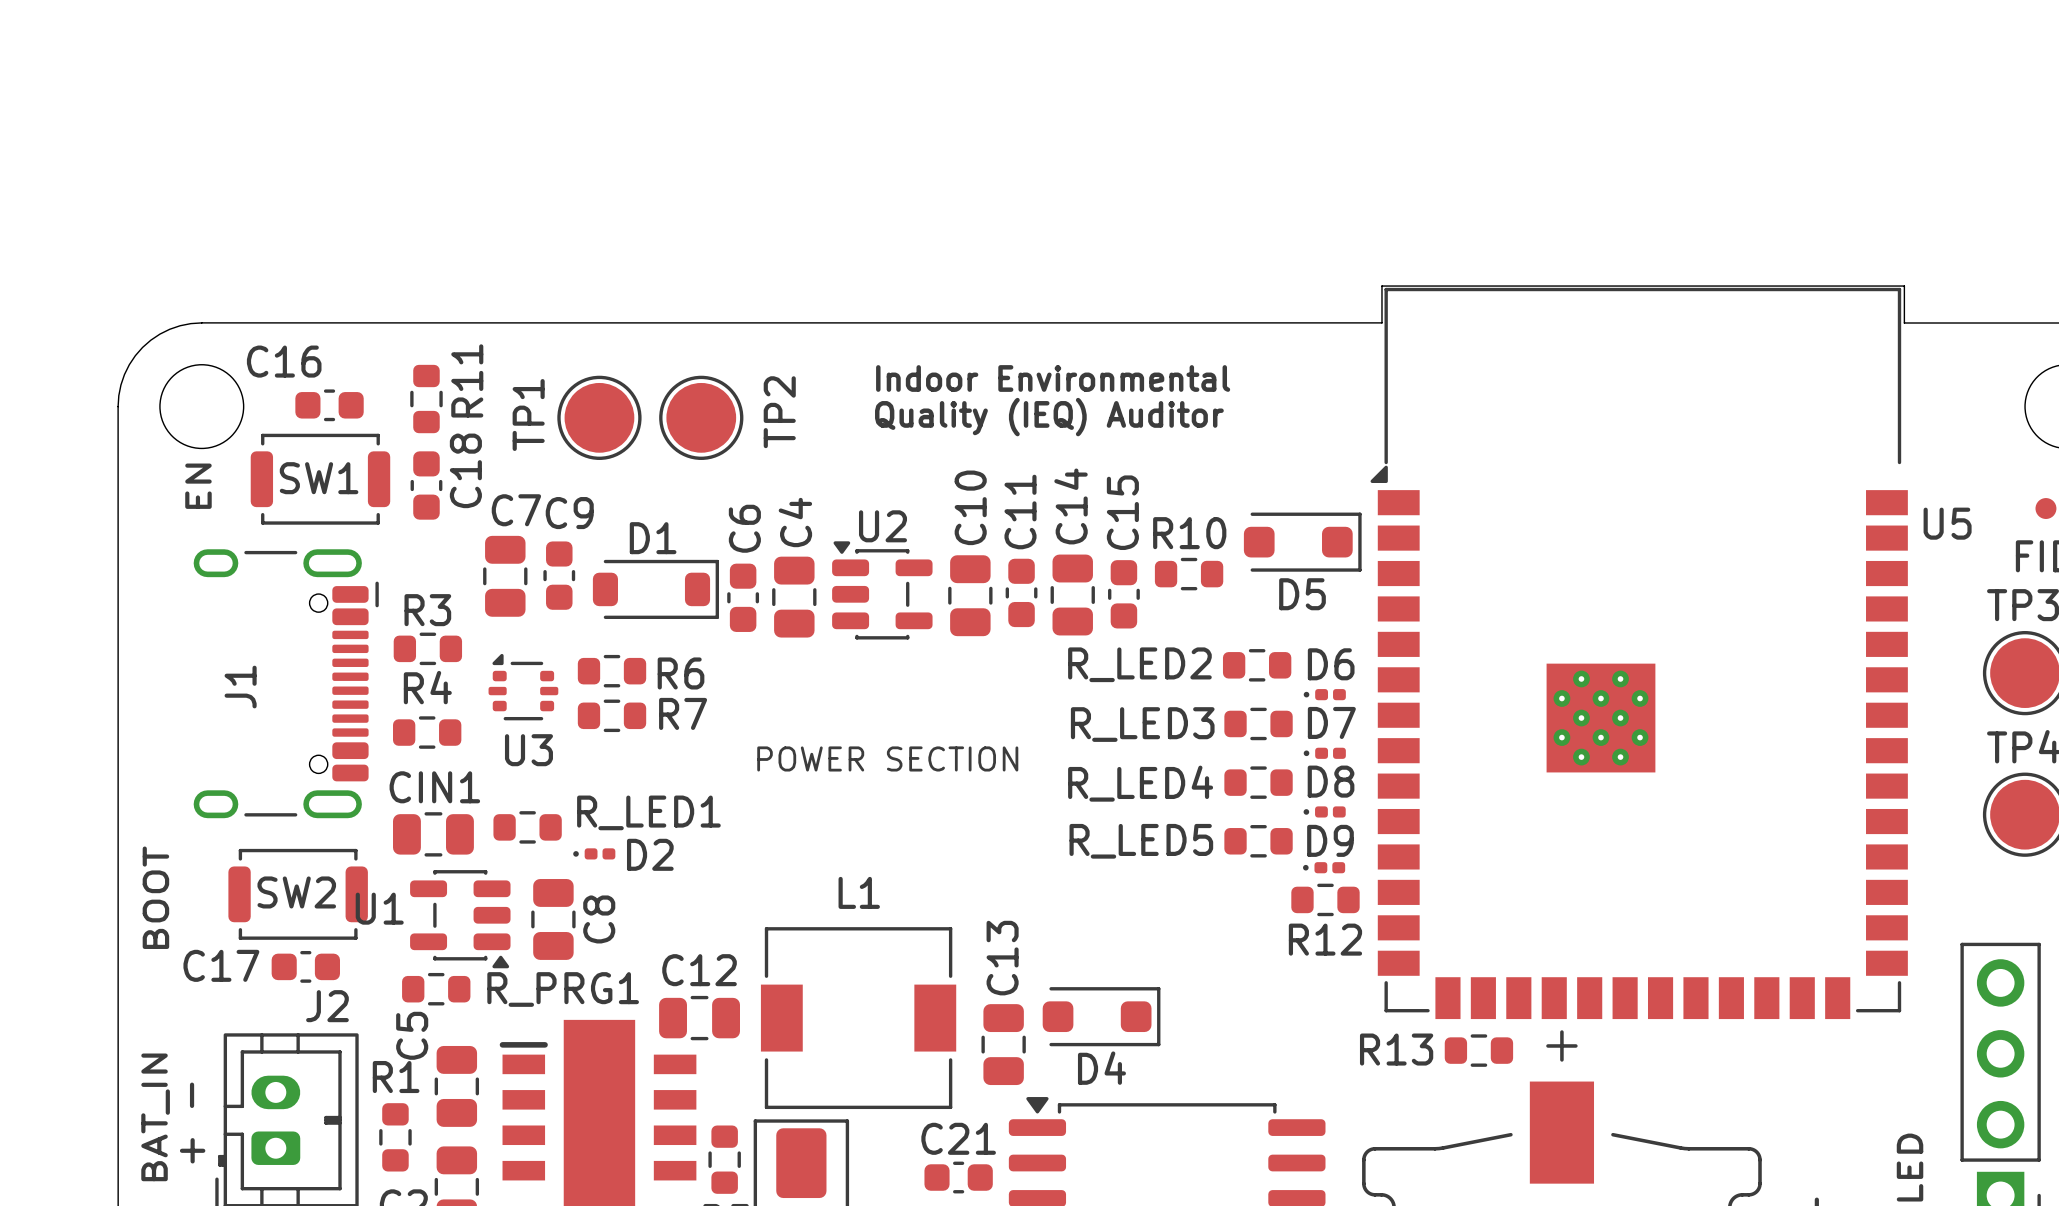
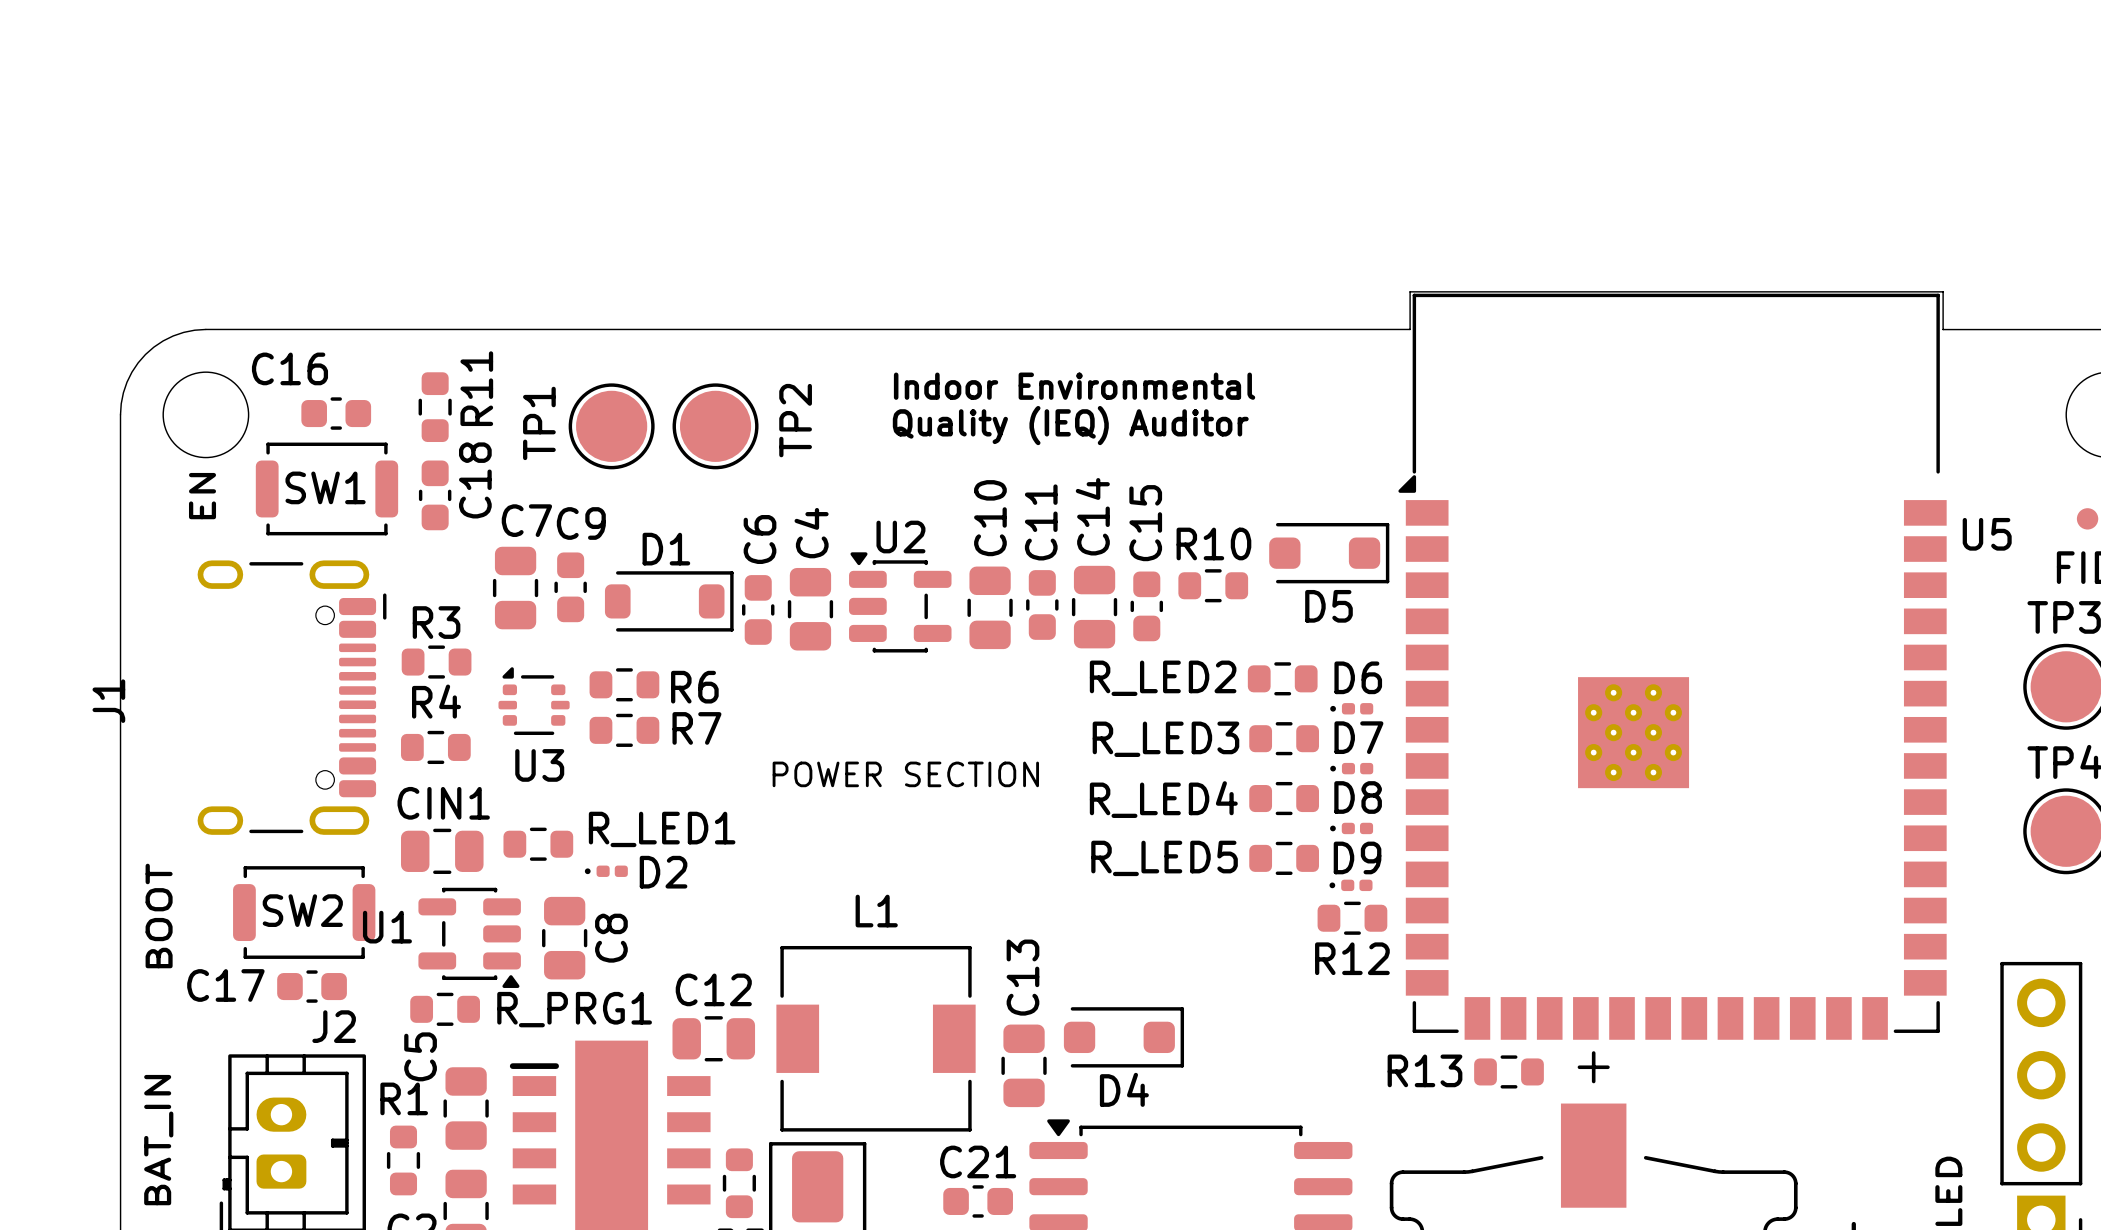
J1 name position: J1 (240, 687) -> J1 (108, 701)
text: - (192, 1095) -> none
text: + (192, 1150) -> none

